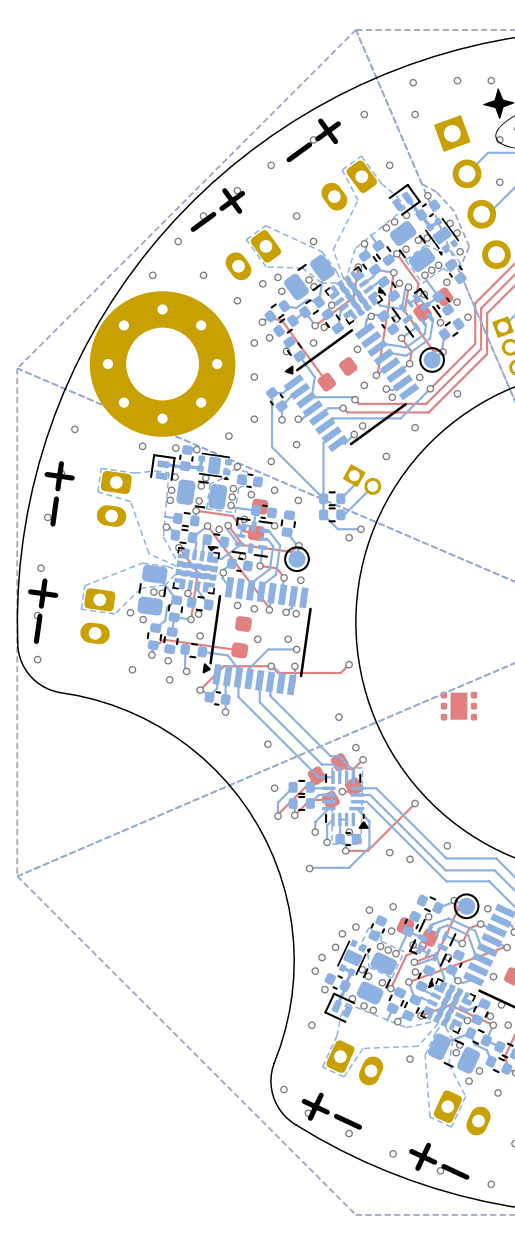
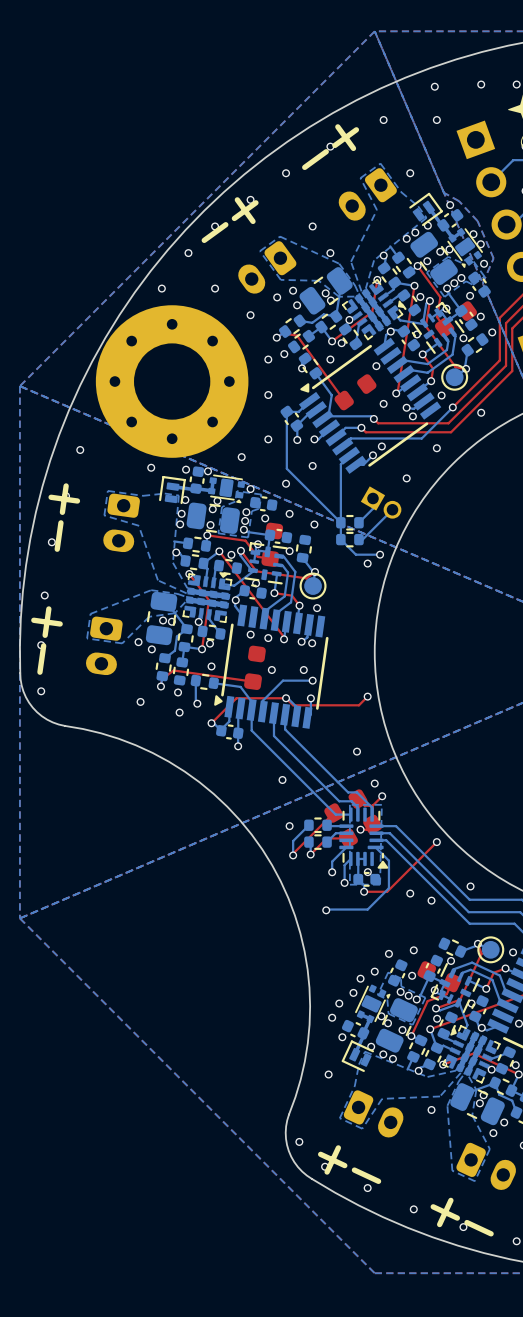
part: (458, 706) -> none

